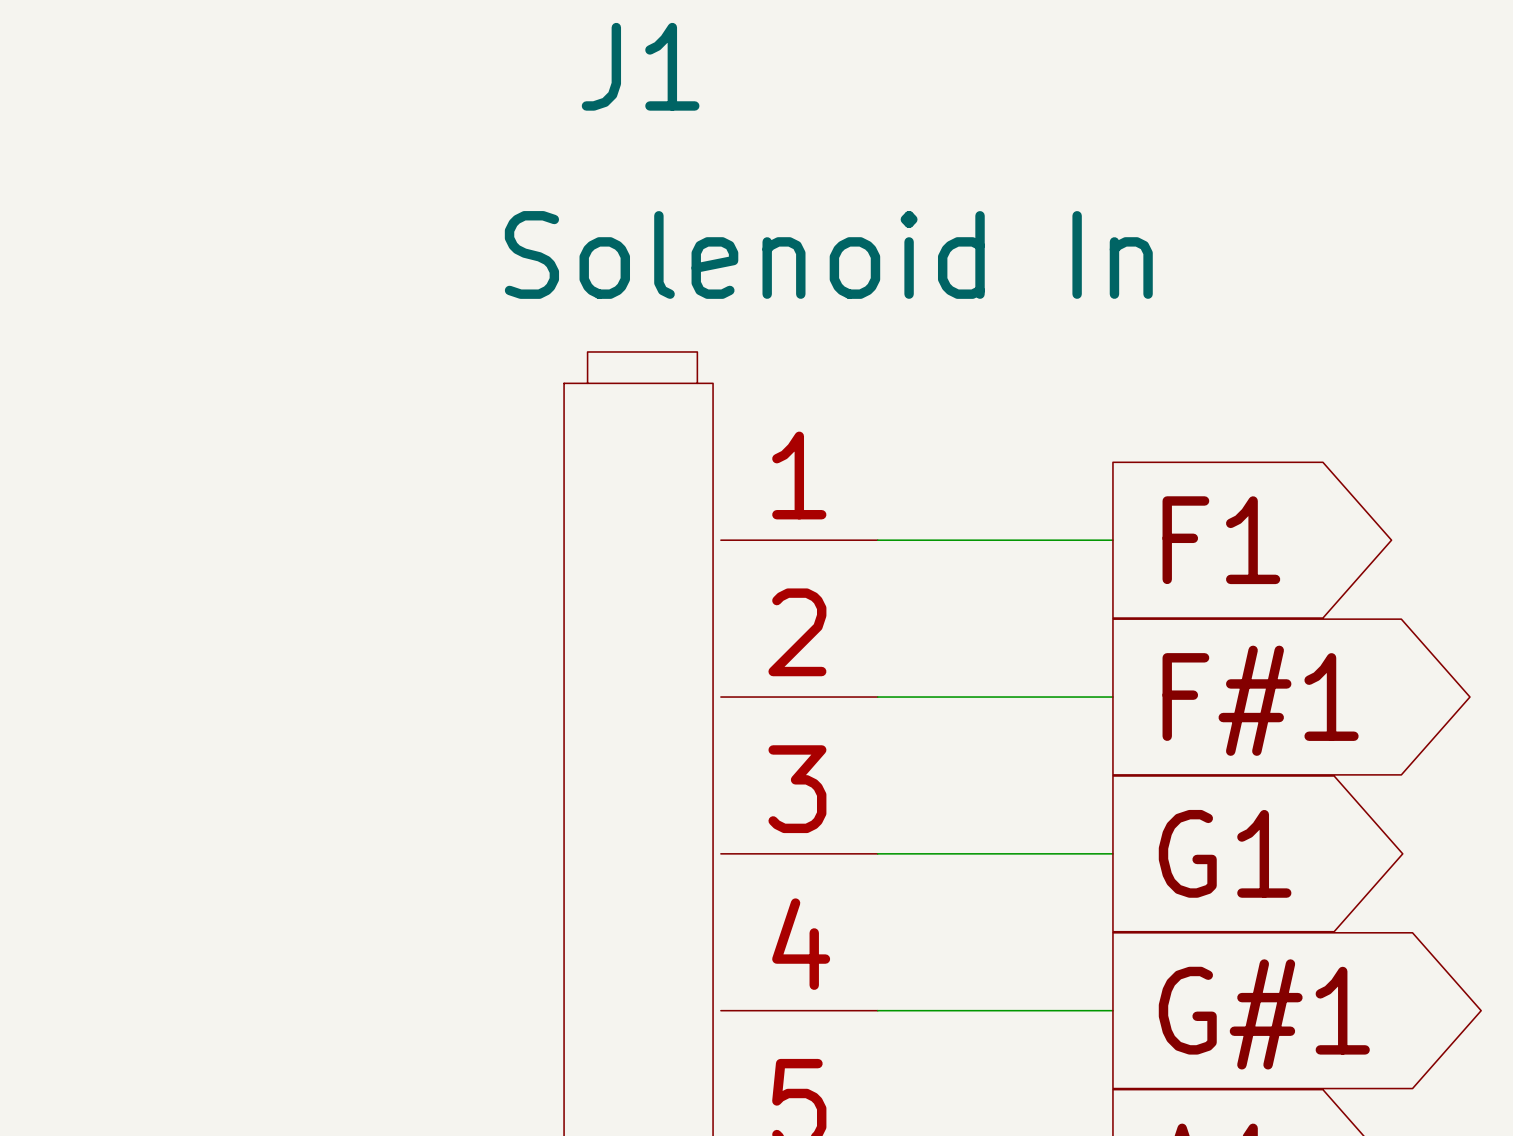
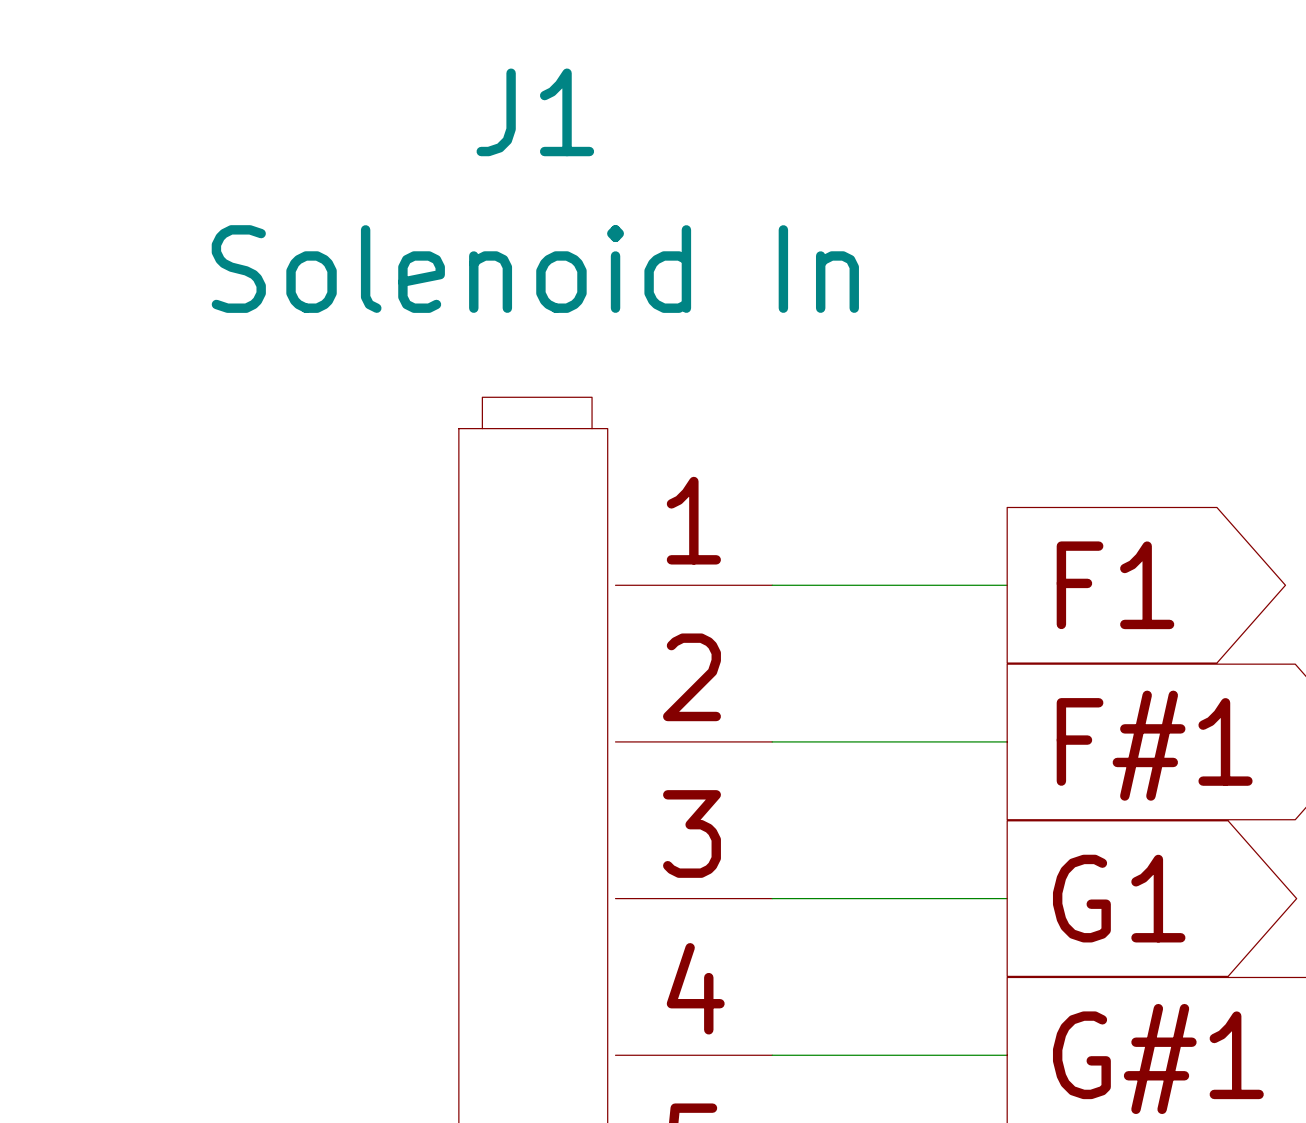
J1 value position: Solenoid In (828, 254) -> Solenoid In (535, 269)

